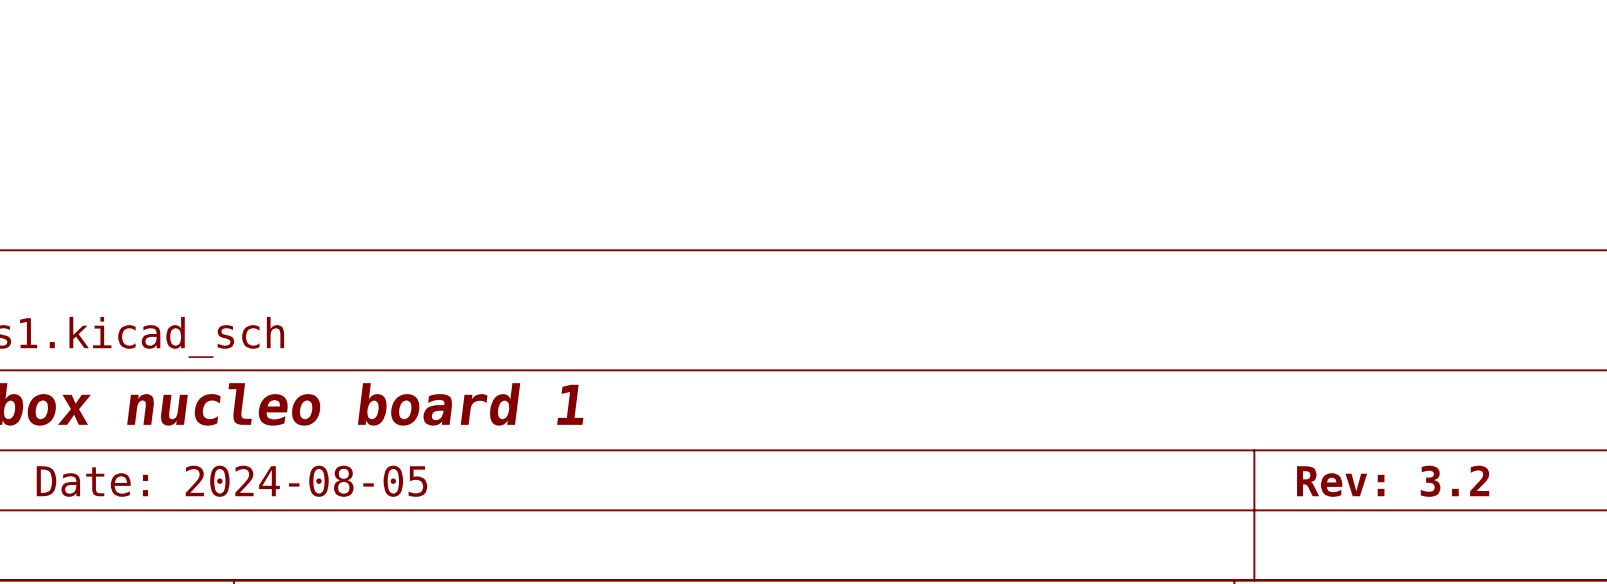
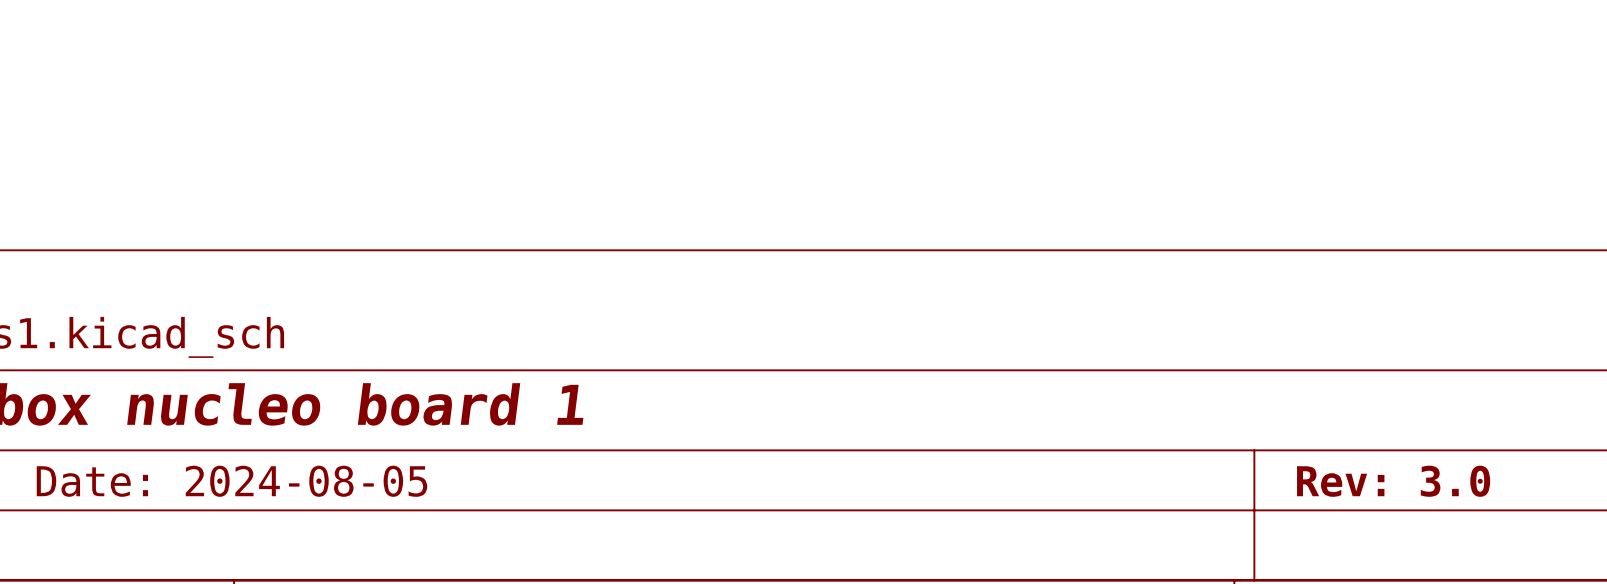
title block: Rev: 3.2 (1393, 481) -> Rev: 3.0 (1393, 481)

